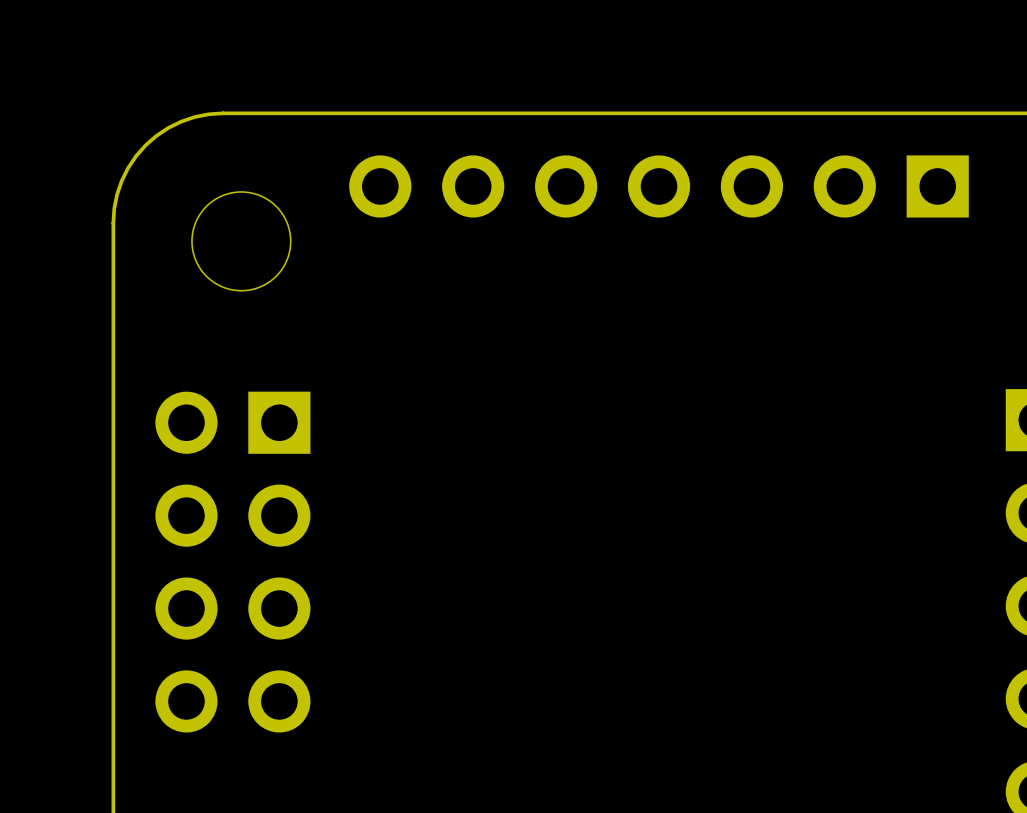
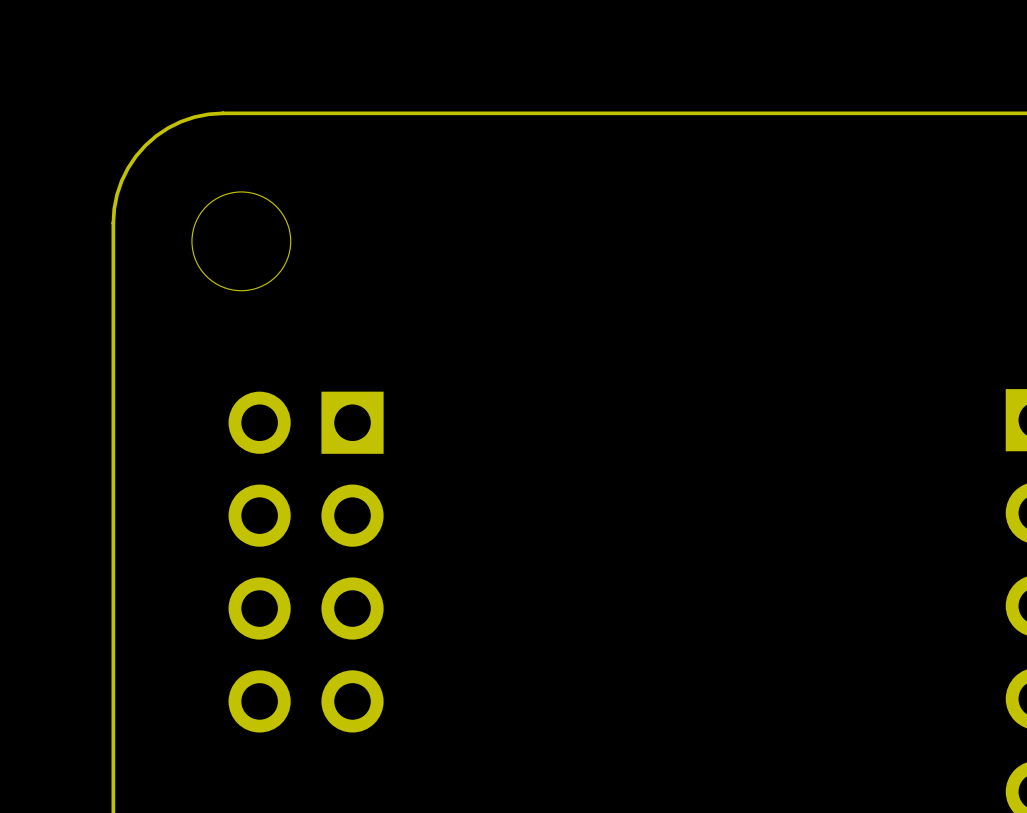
part: (659, 186) -> none
part position: (232, 562) -> (306, 562)

